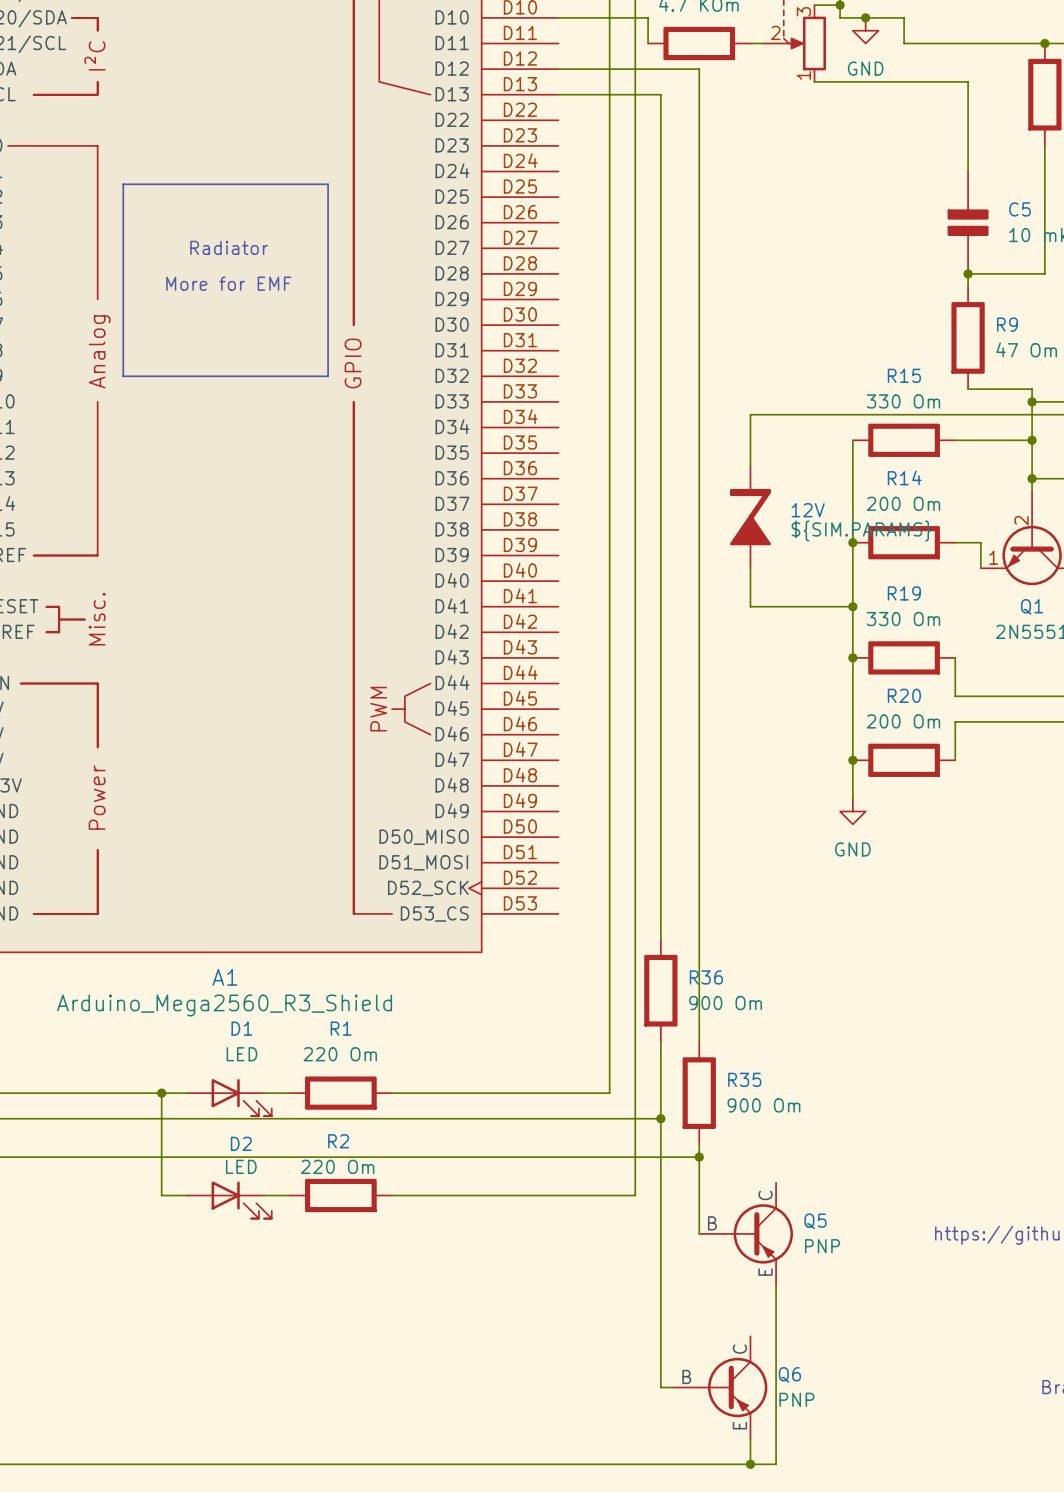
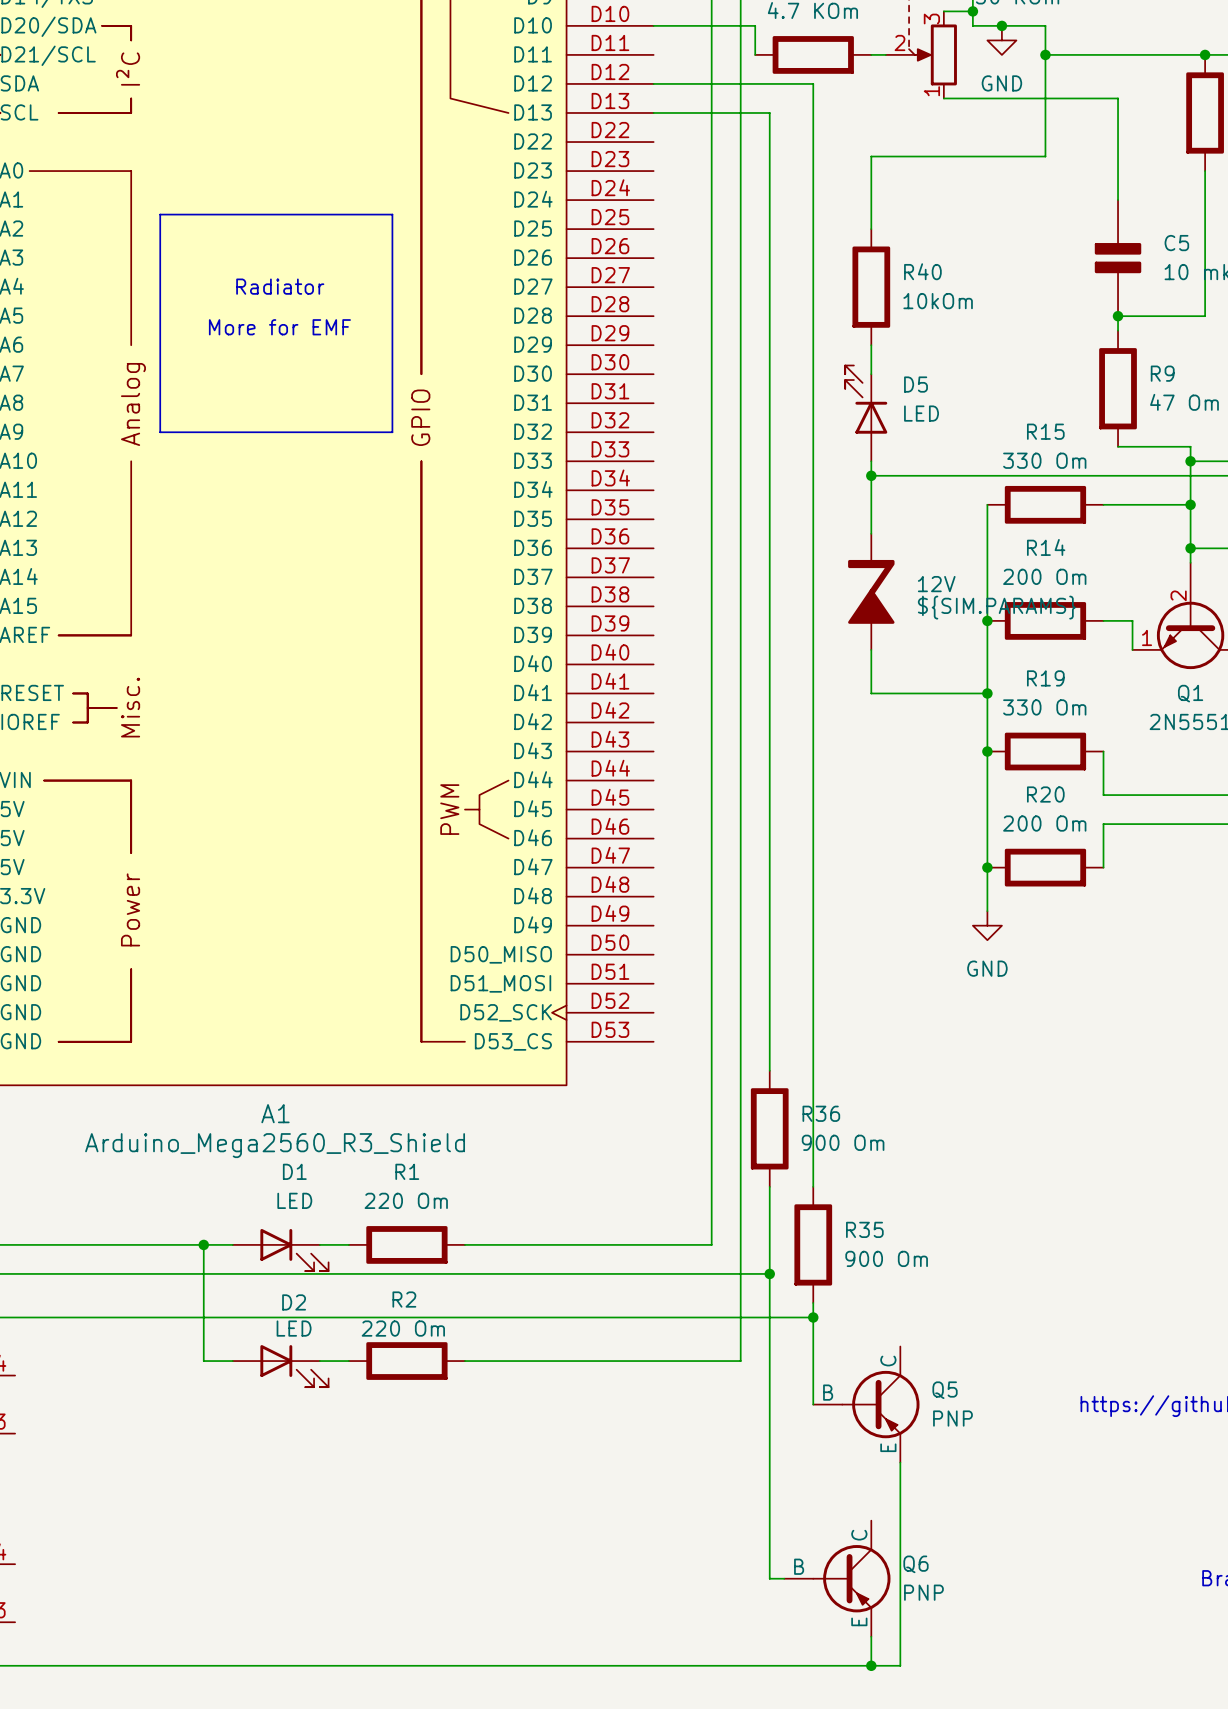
wire: none -> (1045, 54) (1045, 156) (871, 156) (871, 229)
junction: none -> (1045, 54)
R40: none -> 10kOm (871, 287)
wire: none -> (871, 345) (871, 374)
D5: none -> LED (866, 413)
wire: none -> (871, 461) (871, 475)
junction: none -> (871, 475)

